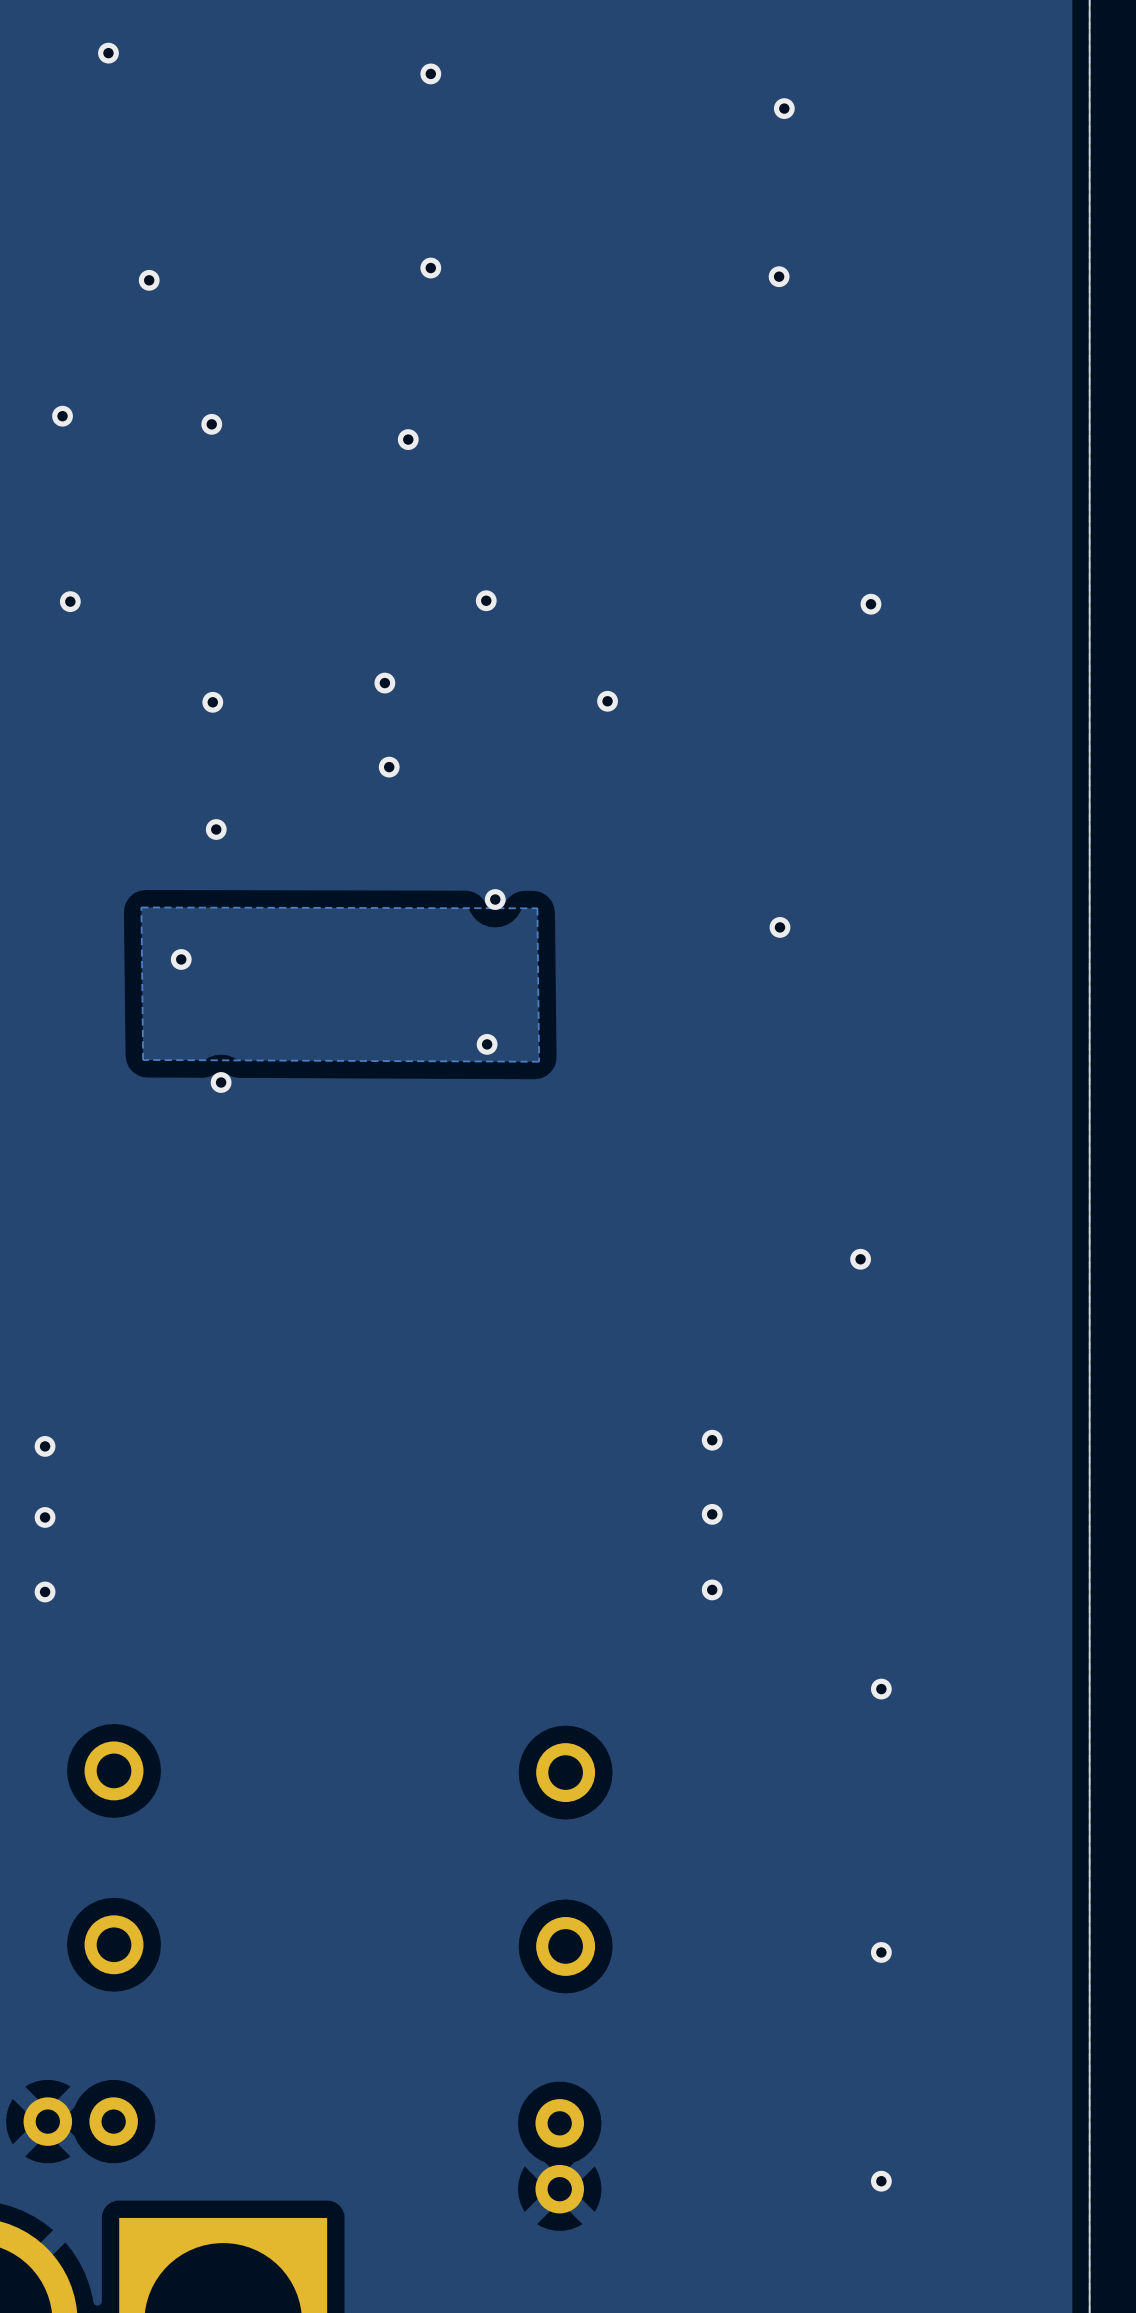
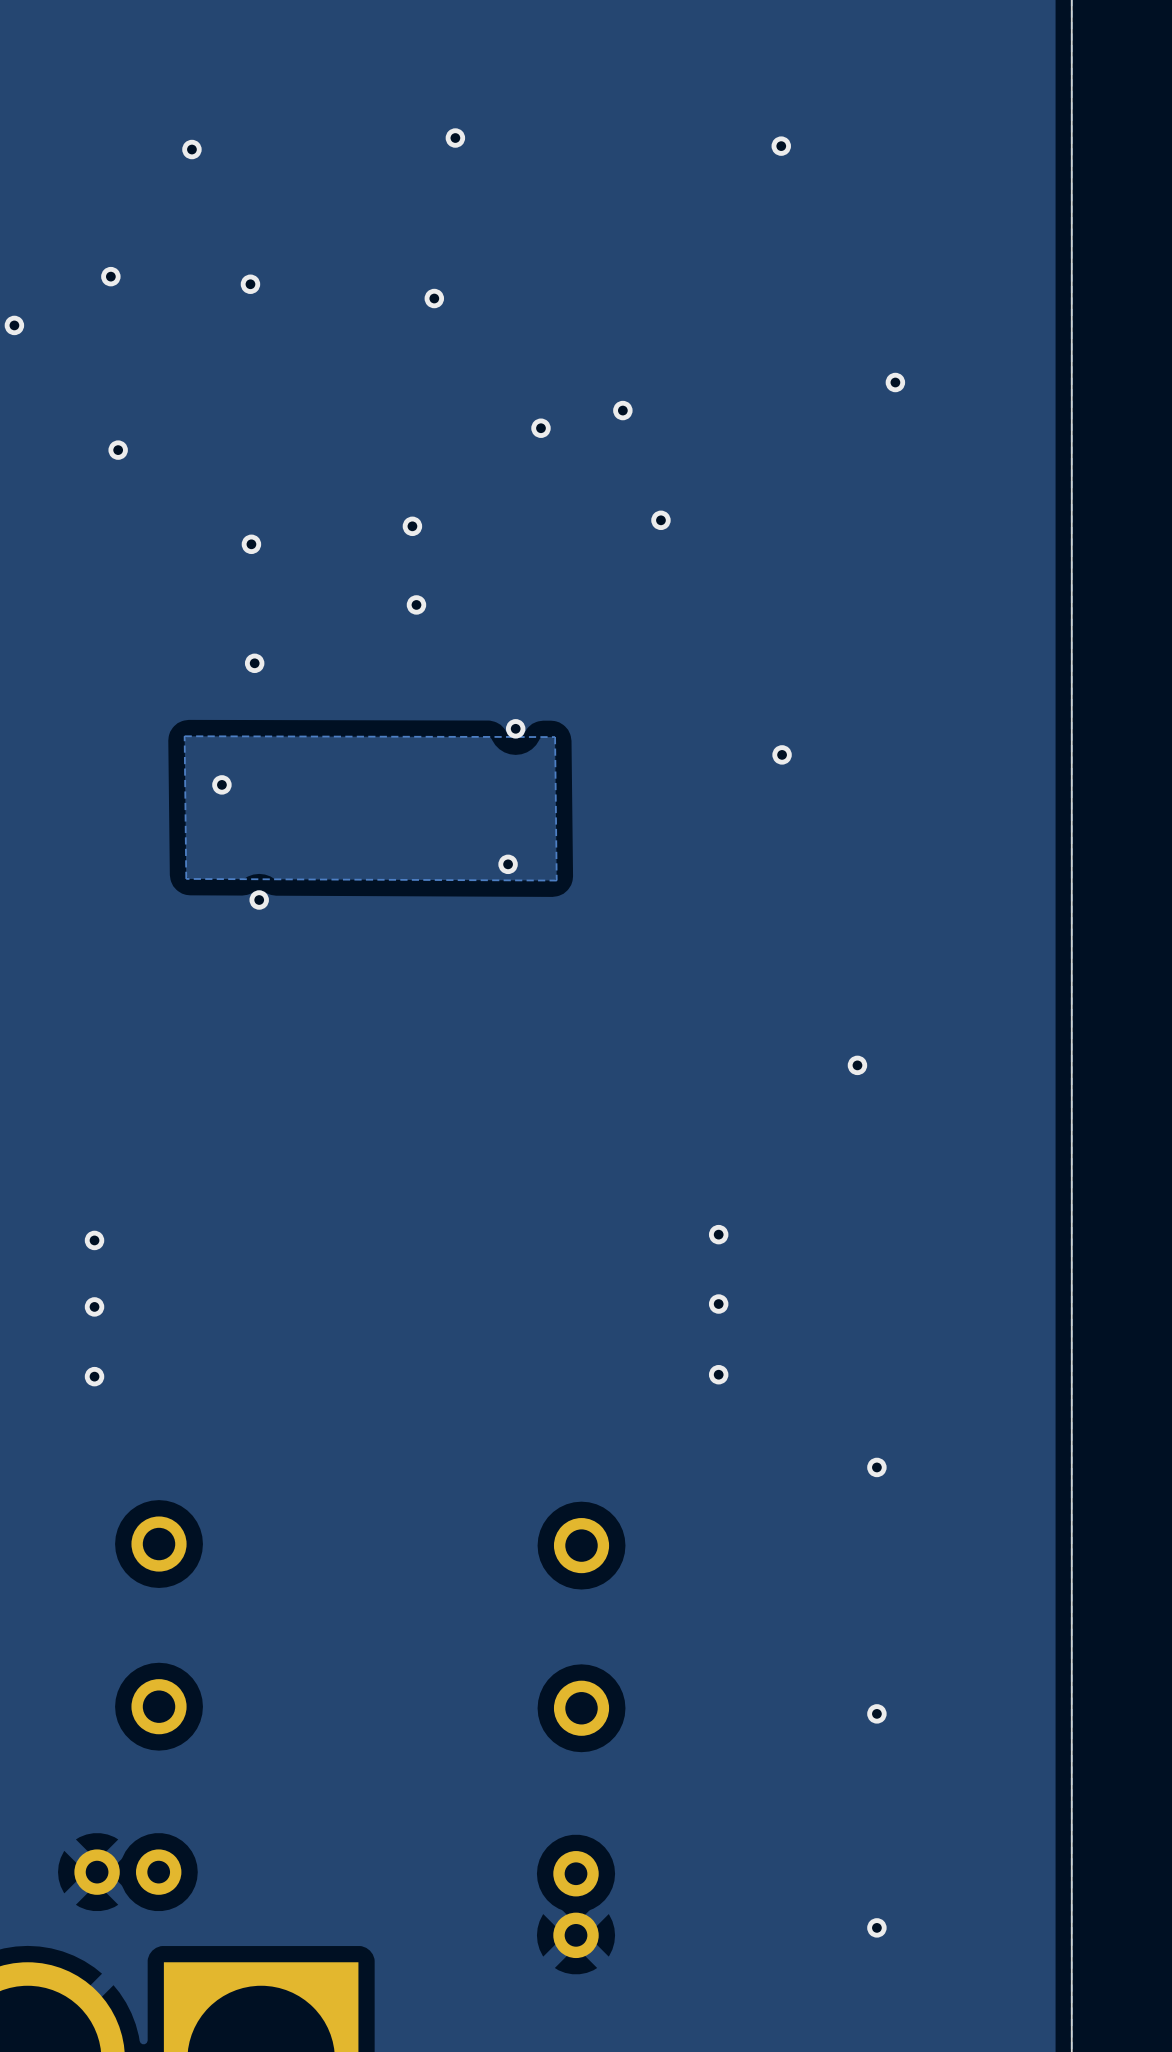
via: none -> (622, 410)
via position: (486, 600) -> (540, 428)
via position: (870, 604) -> (895, 382)
via position: (607, 701) -> (660, 520)

